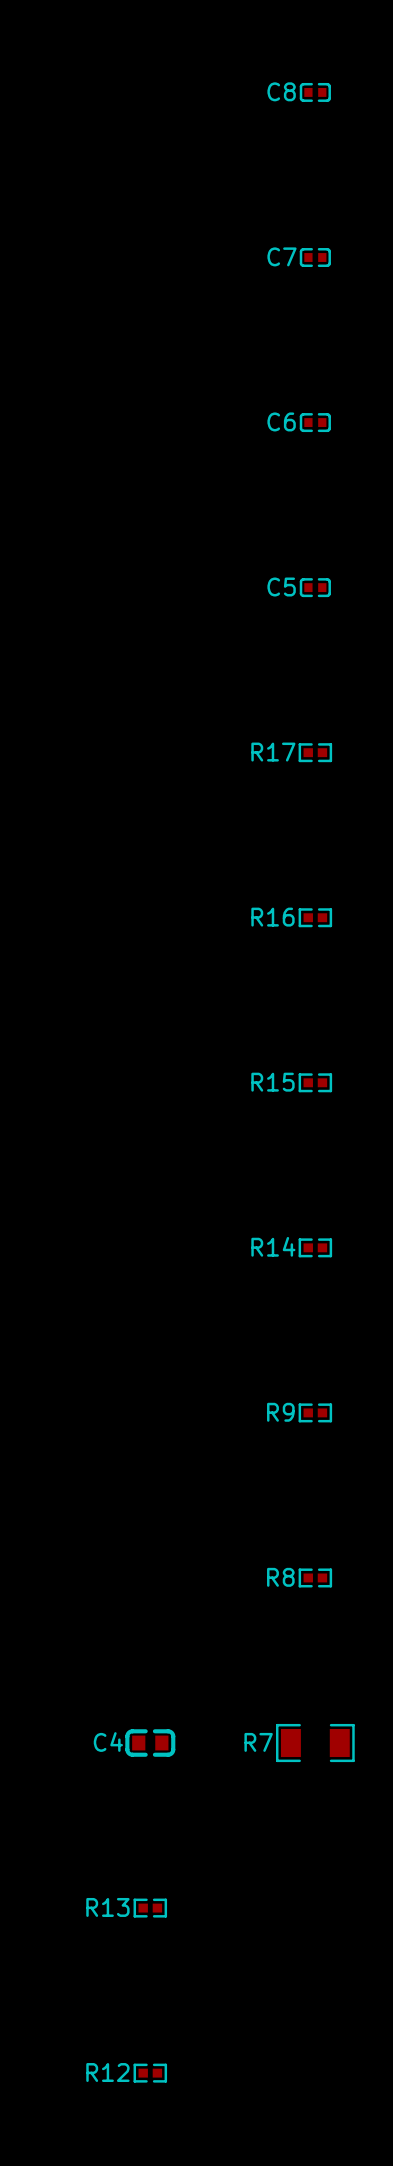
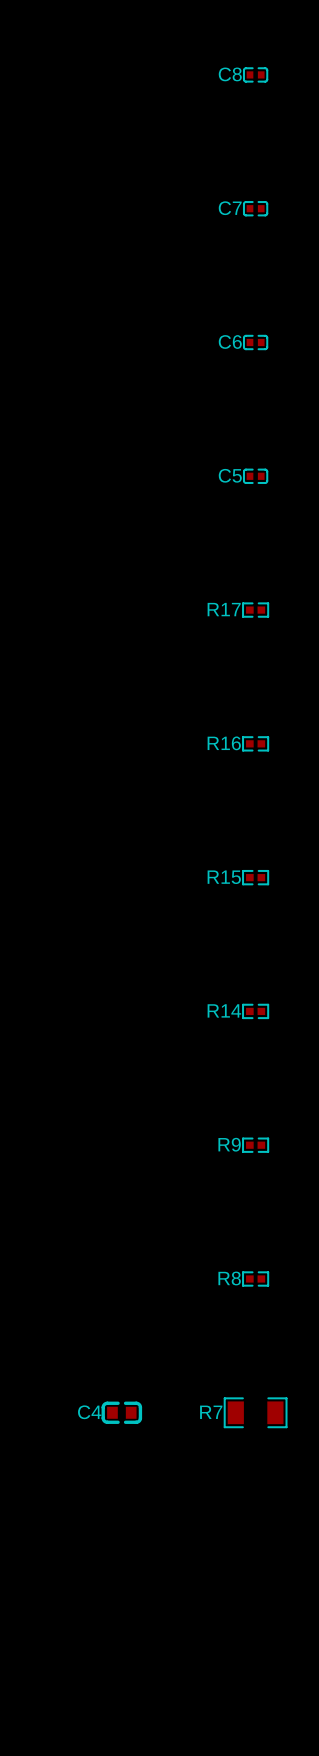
R13: (150, 1908) -> none
R12: (150, 2073) -> none

